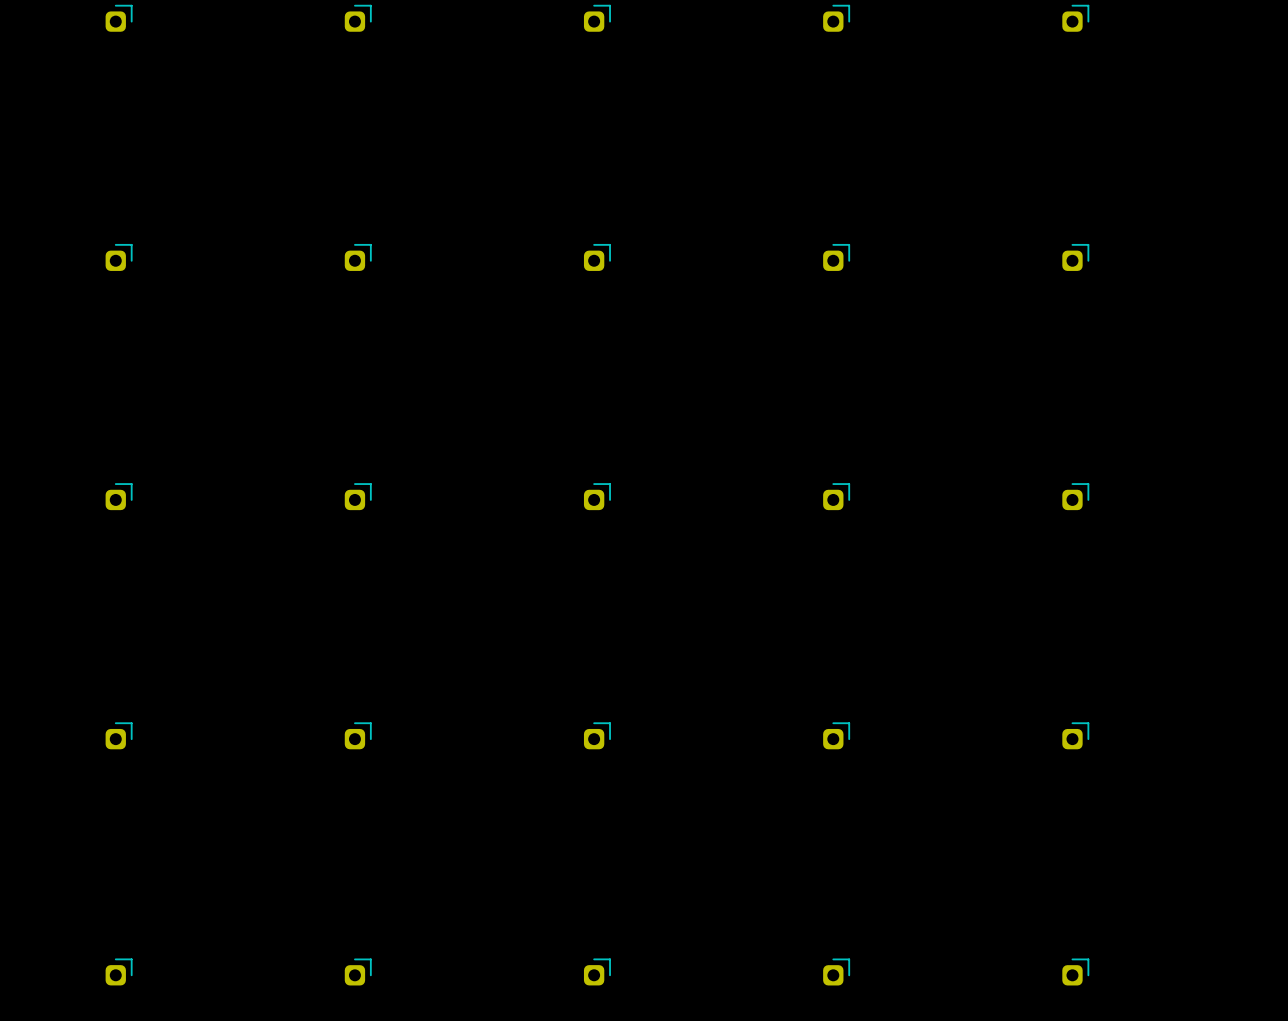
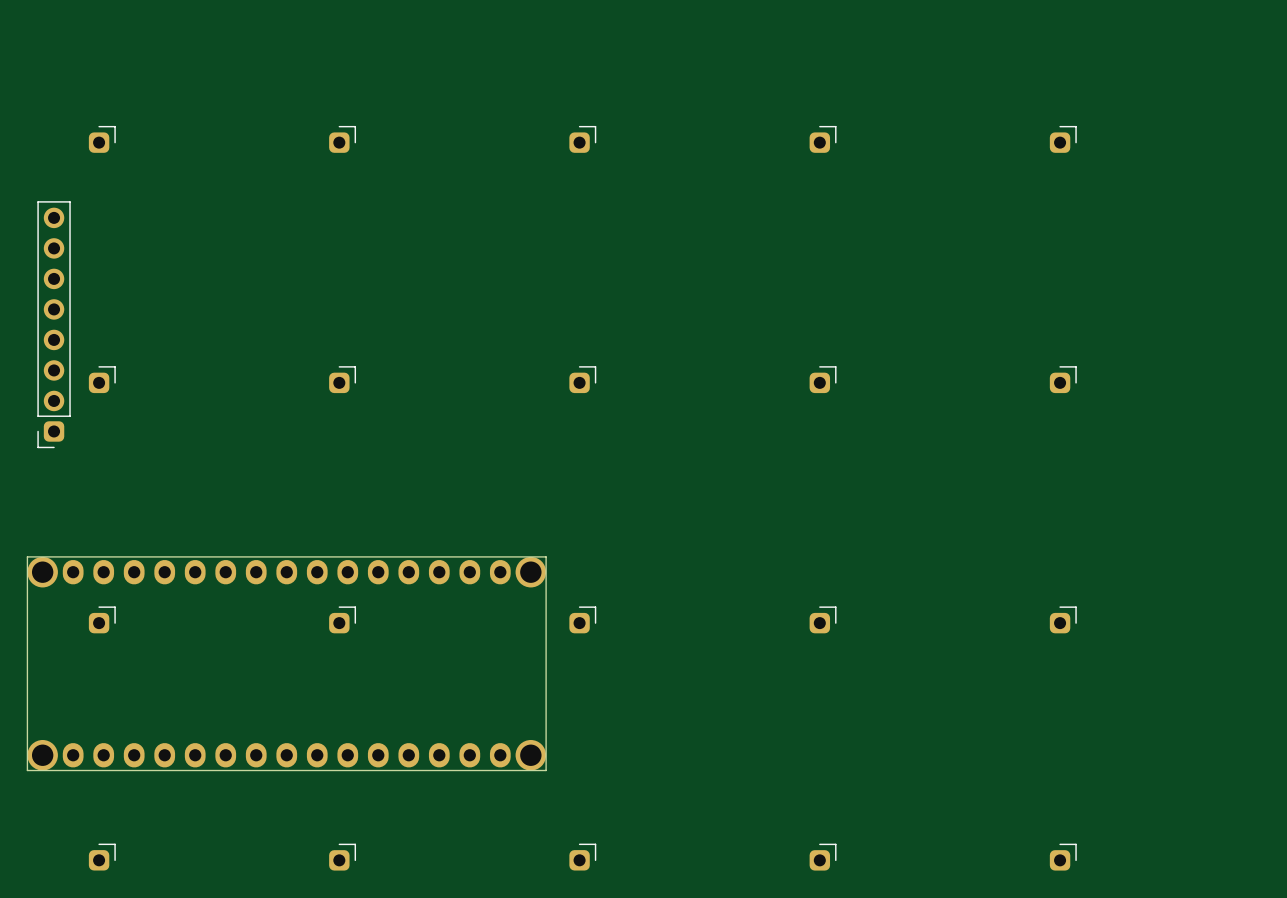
part: none -> (54, 324)
board edge: none -> (27, 556) (546, 556) (546, 770) (27, 770) (27, 556)
part: none -> (42, 572)
part: none -> (286, 572)
part: none -> (530, 572)
part: none -> (42, 755)
part: none -> (286, 755)
part: none -> (530, 755)

